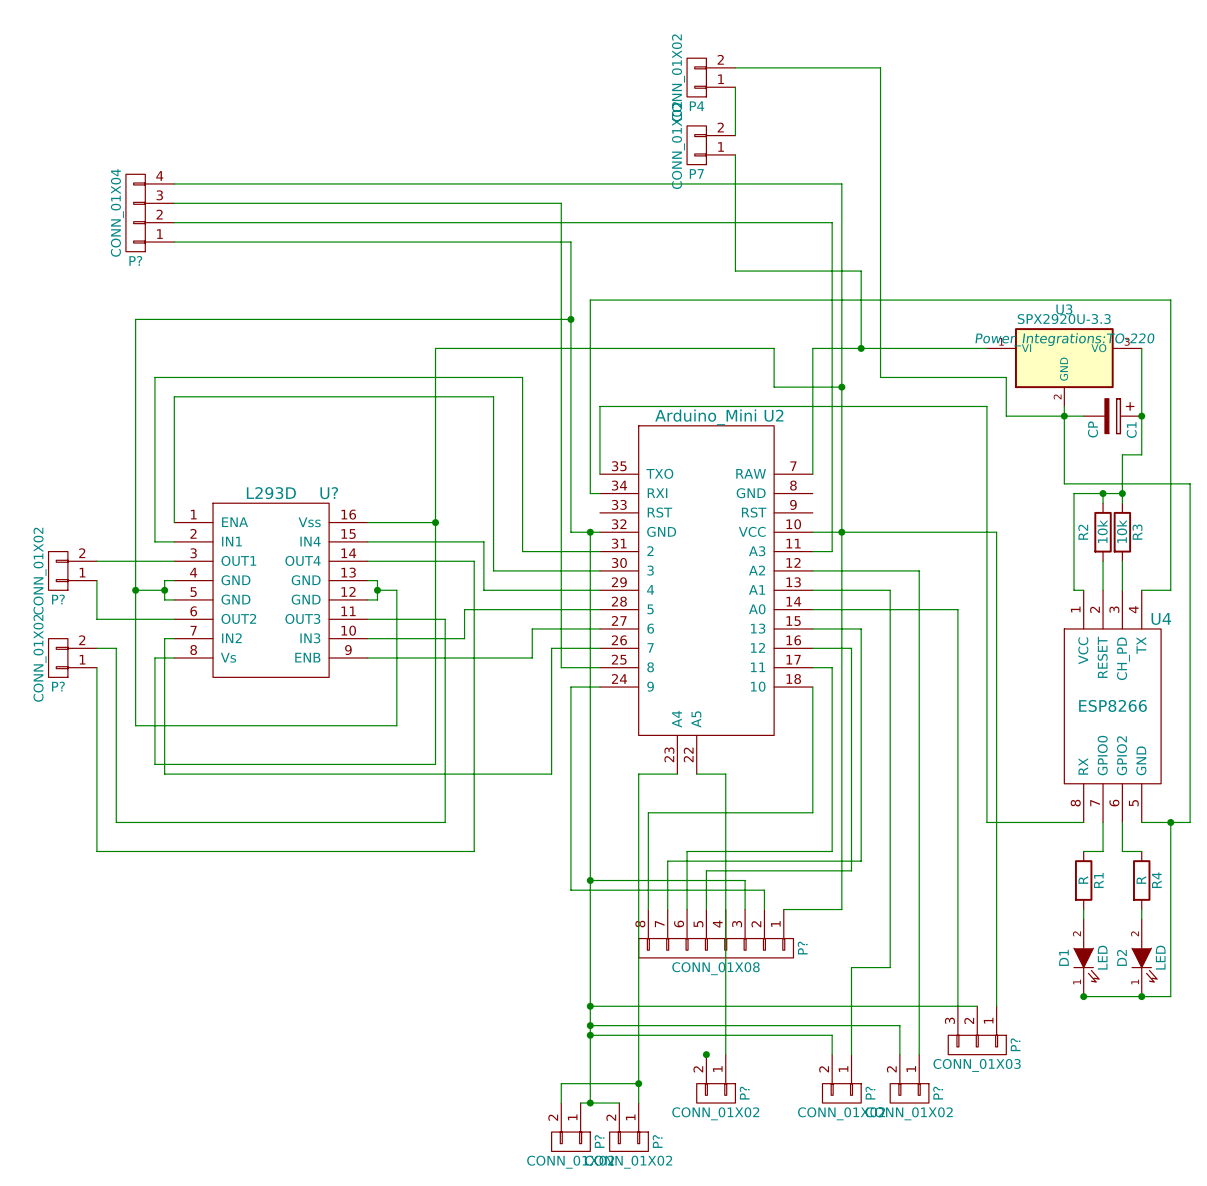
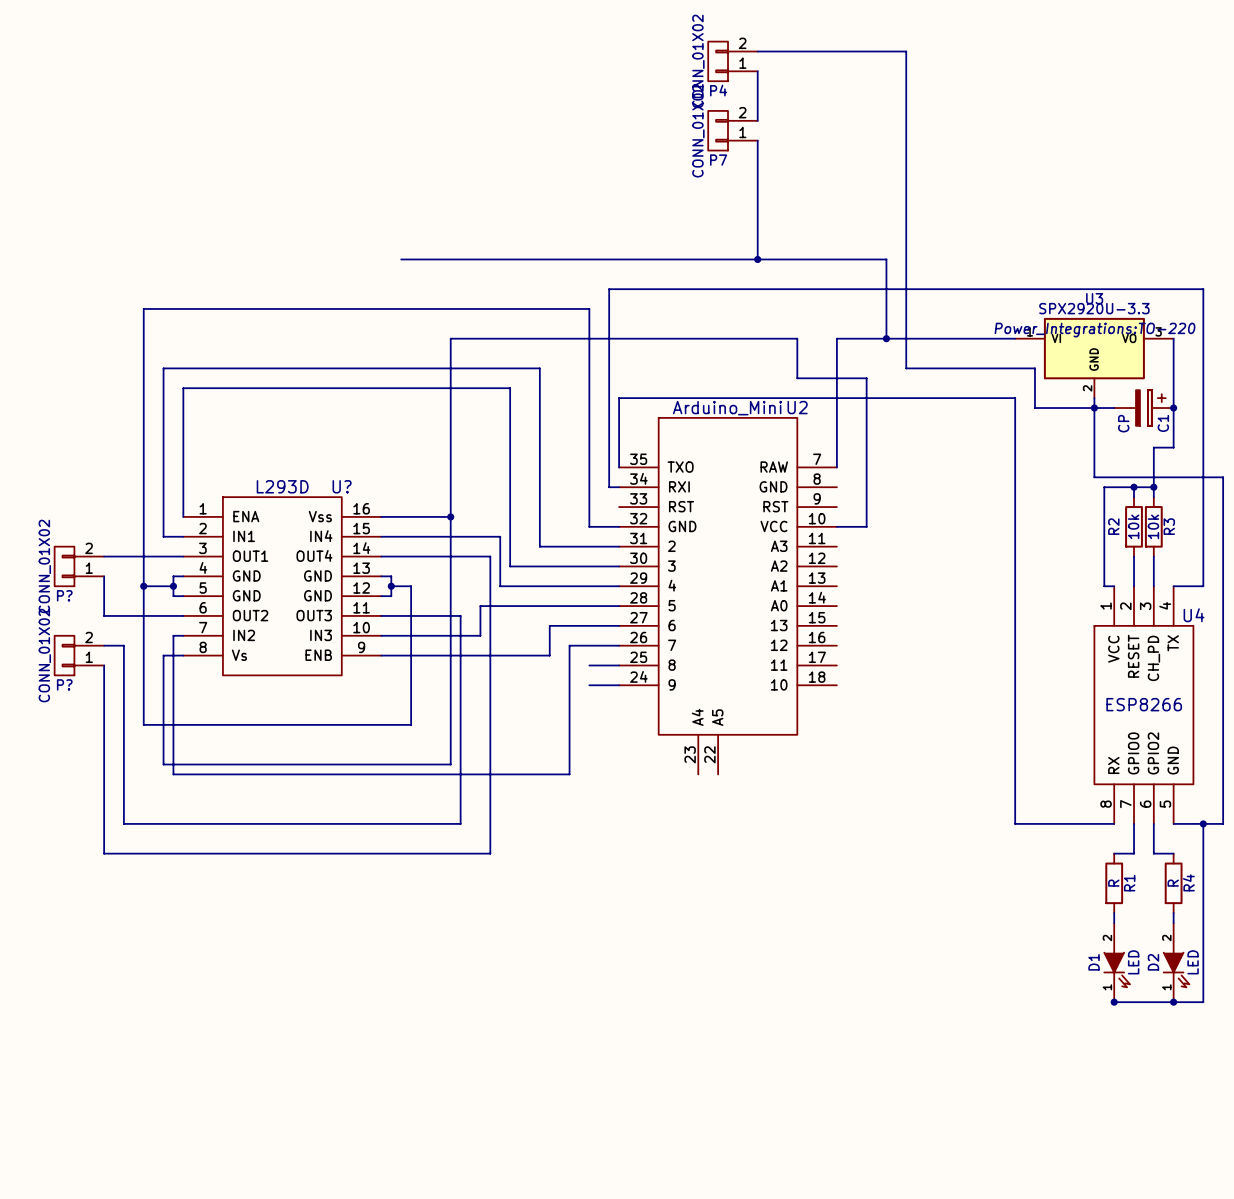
wire: (174, 183) (841, 183) (841, 387) -> none
wire: (174, 203) (561, 203) (561, 667) (570, 667) -> none
P?: CONN_01X04 (150, 213) -> none
wire: (174, 222) (832, 222) (832, 551) (812, 551) -> none
wire: (174, 242) (570, 242) (570, 319) -> none
wire: none -> (401, 259) (757, 259)
junction: none -> (757, 259)
junction: (570, 319) -> none
junction: (841, 387) -> none
wire: (590, 532) (590, 1103) -> none
junction: (590, 532) -> none
junction: (841, 532) -> none
wire: (812, 570) (919, 570) (919, 1054) -> none
wire: (812, 590) (890, 590) (890, 967) (851, 967) (851, 1054) -> none
wire: (812, 609) (957, 609) (957, 1006) -> none
wire: (812, 628) (861, 628) (861, 861) (667, 861) (667, 909) -> none
wire: (812, 648) (851, 648) (851, 870) (706, 870) (706, 909) -> none
wire: (812, 667) (832, 667) (832, 851) (687, 851) (687, 909) -> none
wire: (570, 687) (570, 890) (764, 890) (764, 909) -> none
wire: (812, 687) (812, 812) (648, 812) (648, 909) -> none
wire: (677, 774) (638, 774) (638, 1103) -> none
wire: (696, 774) (725, 774) (725, 1054) -> none
wire: (590, 880) (745, 880) (745, 909) -> none
junction: (590, 880) -> none
wire: (783, 909) (841, 909) (841, 532) (996, 532) (996, 1006) -> none
P?: CONN_01X08 (716, 933) -> none
wire: (590, 1006) (977, 1006) -> none
junction: (590, 1006) -> none
wire: (590, 1025) (899, 1025) (899, 1054) -> none
junction: (590, 1025) -> none
P?: CONN_01X03 (977, 1030) -> none
wire: (590, 1035) (832, 1035) (832, 1054) -> none
junction: (590, 1035) -> none
junction: (706, 1054) -> none
P?: CONN_01X02 (716, 1078) -> none
P?: CONN_01X02 (841, 1078) -> none
P?: CONN_01X02 (909, 1078) -> none
wire: (638, 1083) (561, 1083) (561, 1103) -> none
junction: (638, 1083) -> none
wire: (580, 1103) (619, 1103) -> none
junction: (590, 1103) -> none
P?: CONN_01X02 (570, 1127) -> none
P?: CONN_01X02 (629, 1127) -> none

